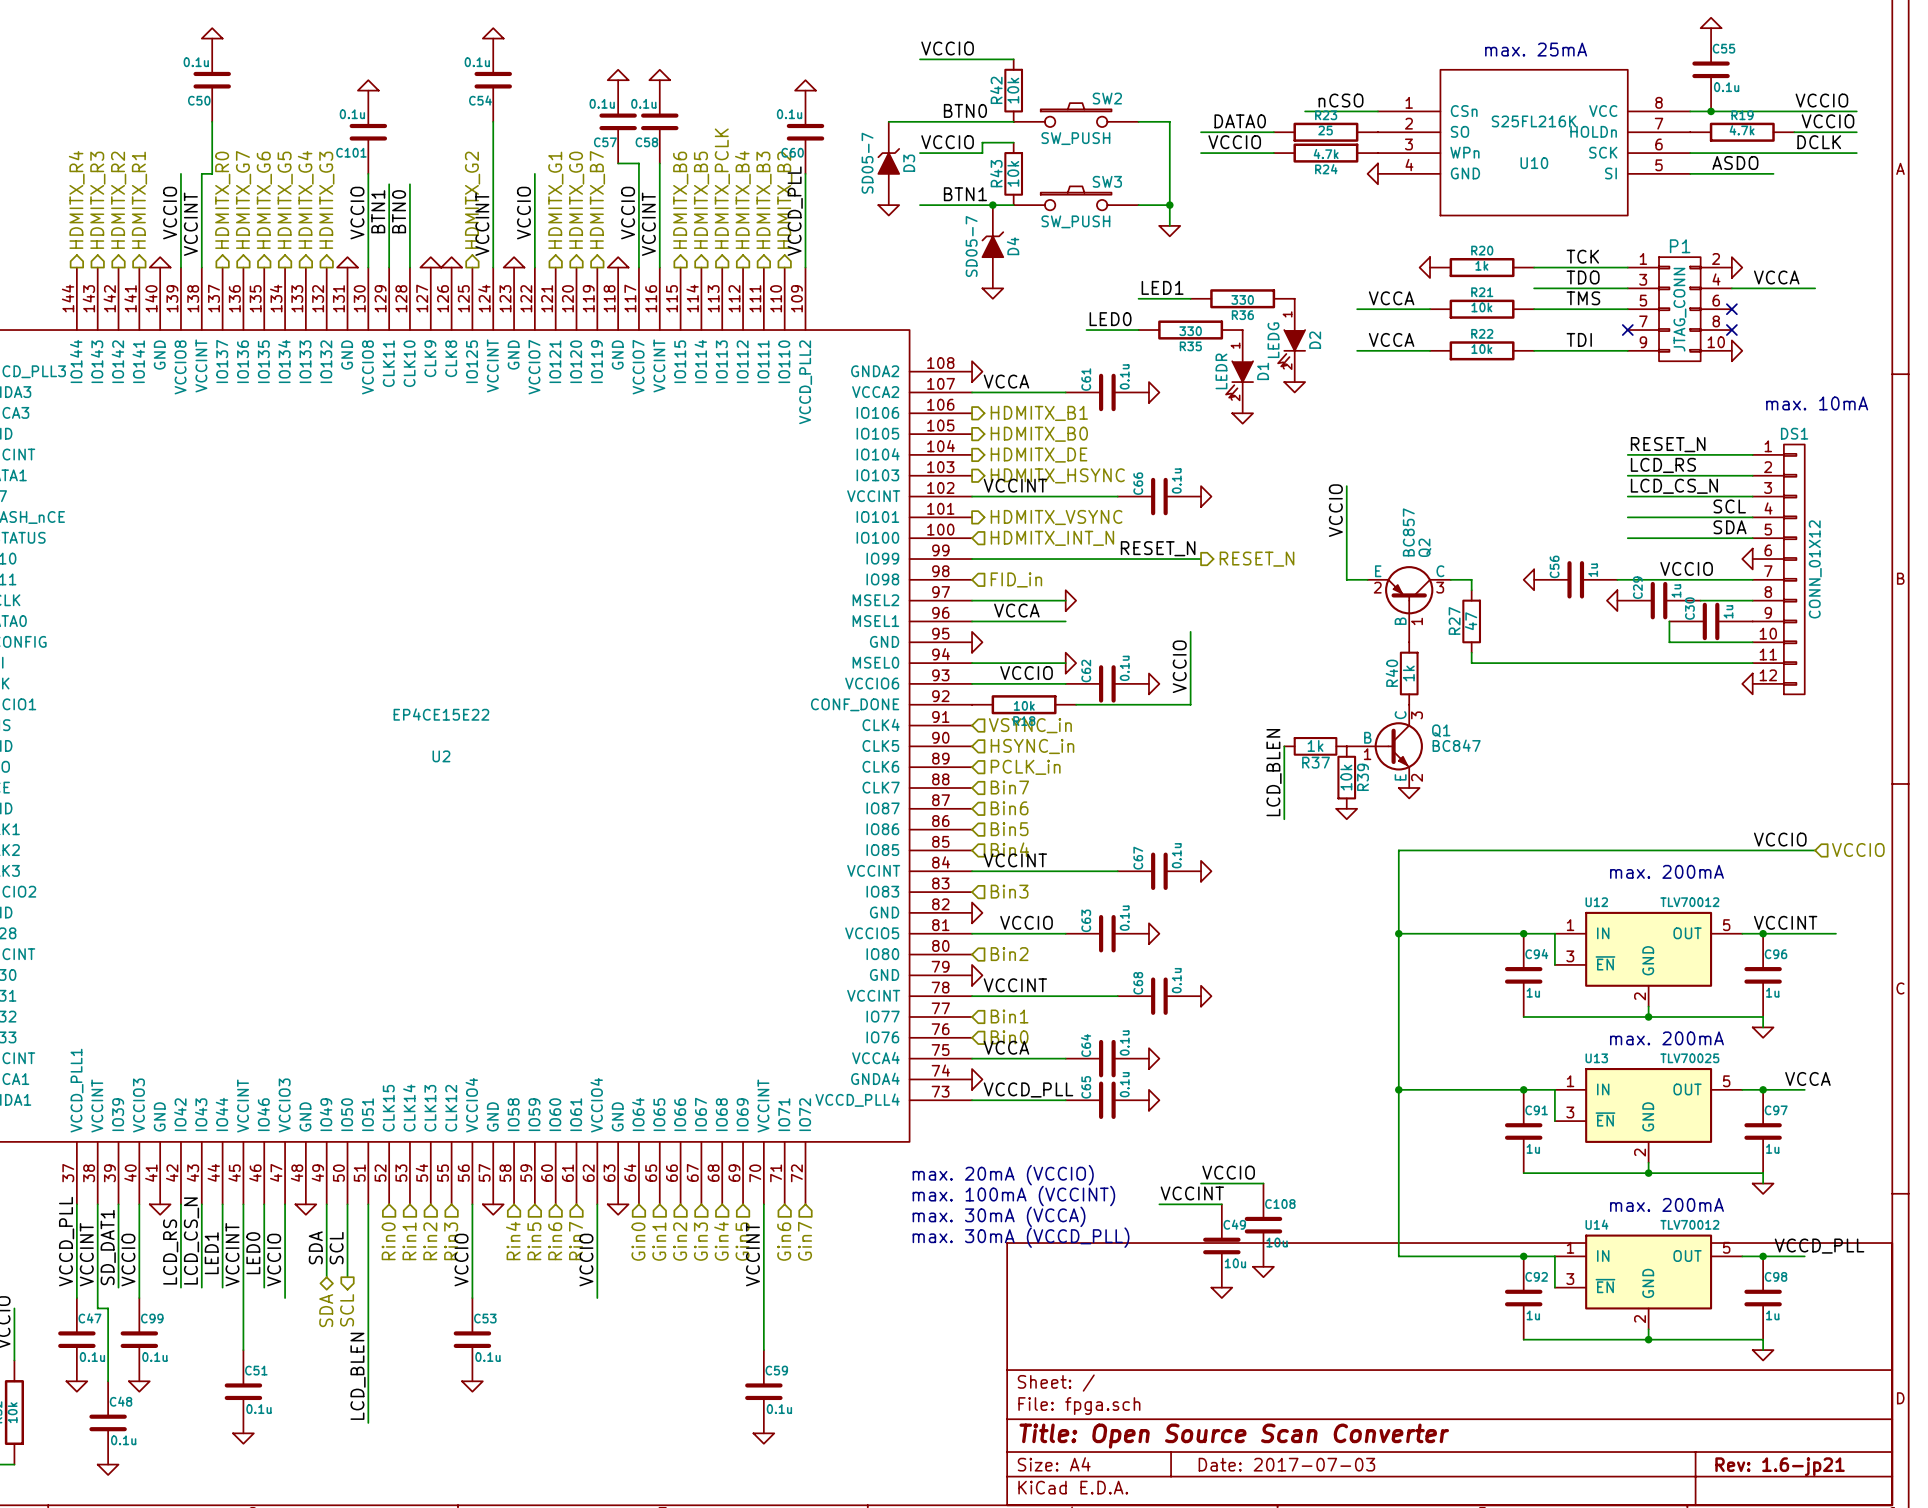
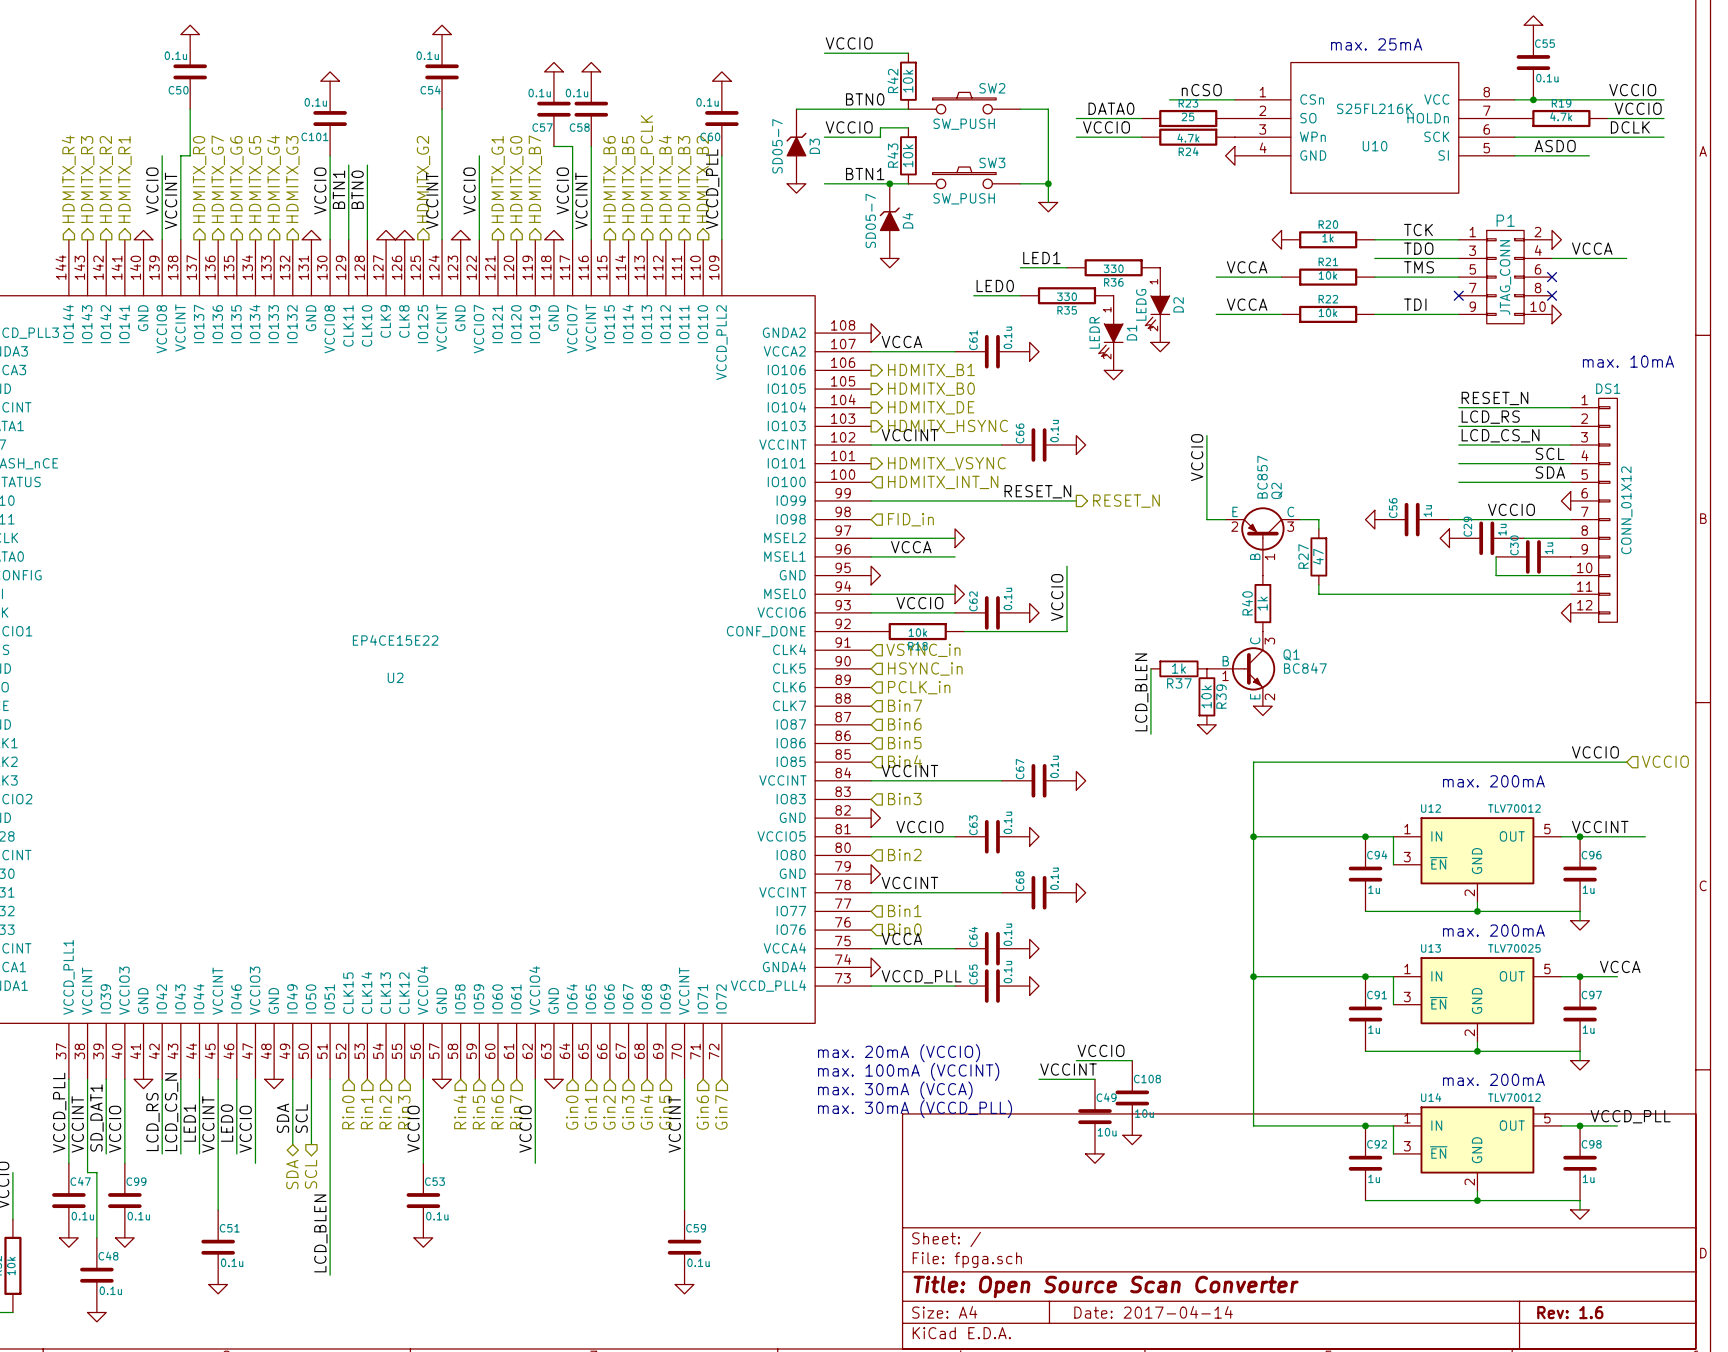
title block: Date: 2017-07-03 (1286, 1464) -> Date: 2017-04-14 (1153, 1312)
title block: Rev: 1.6-jp21 (1780, 1466) -> Rev: 1.6 (1570, 1312)

